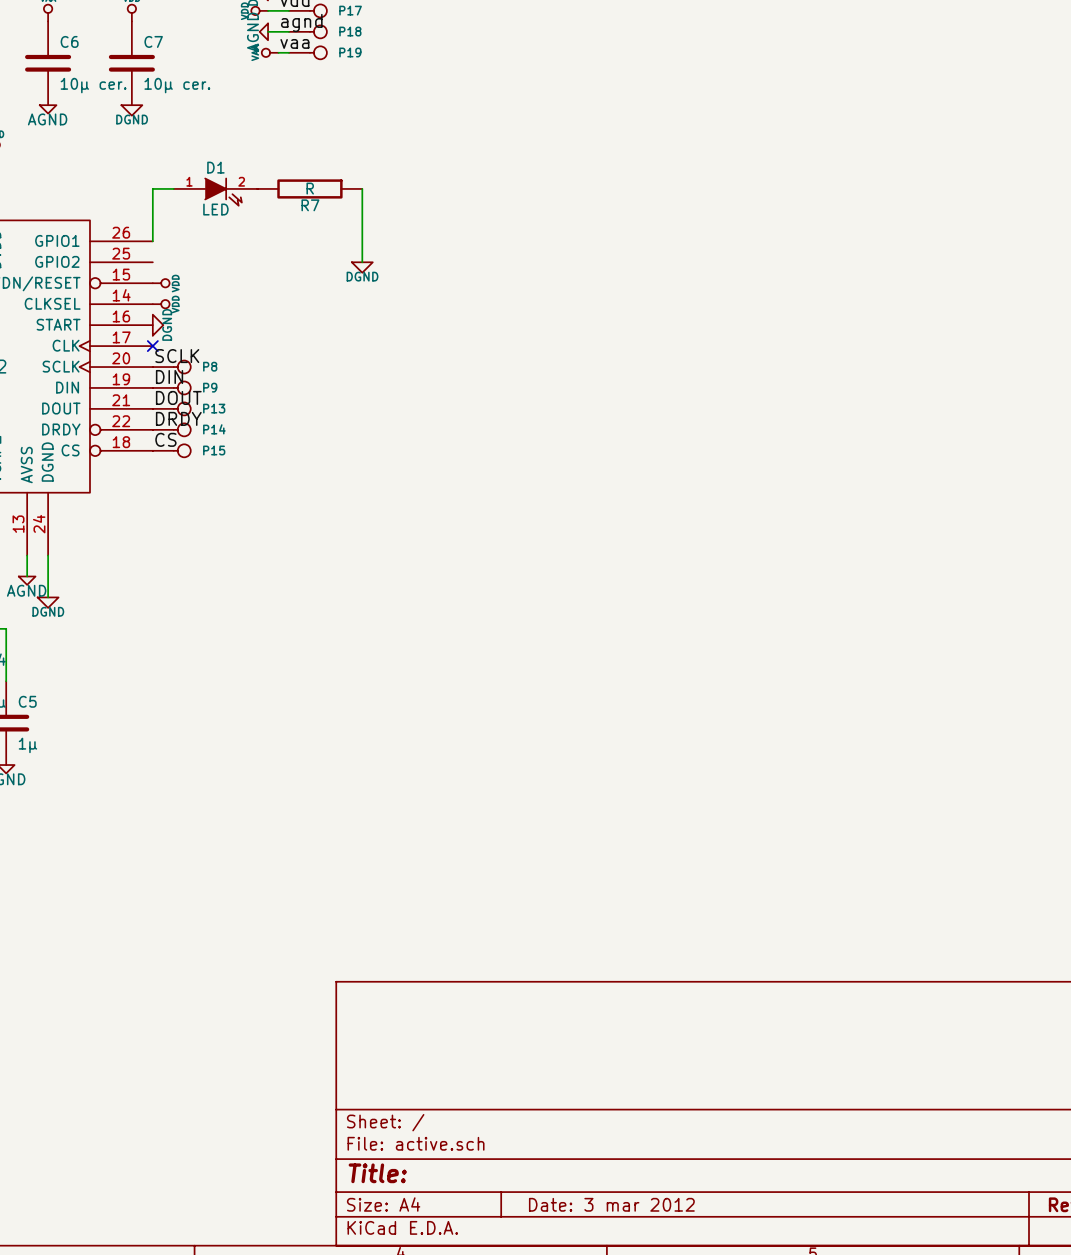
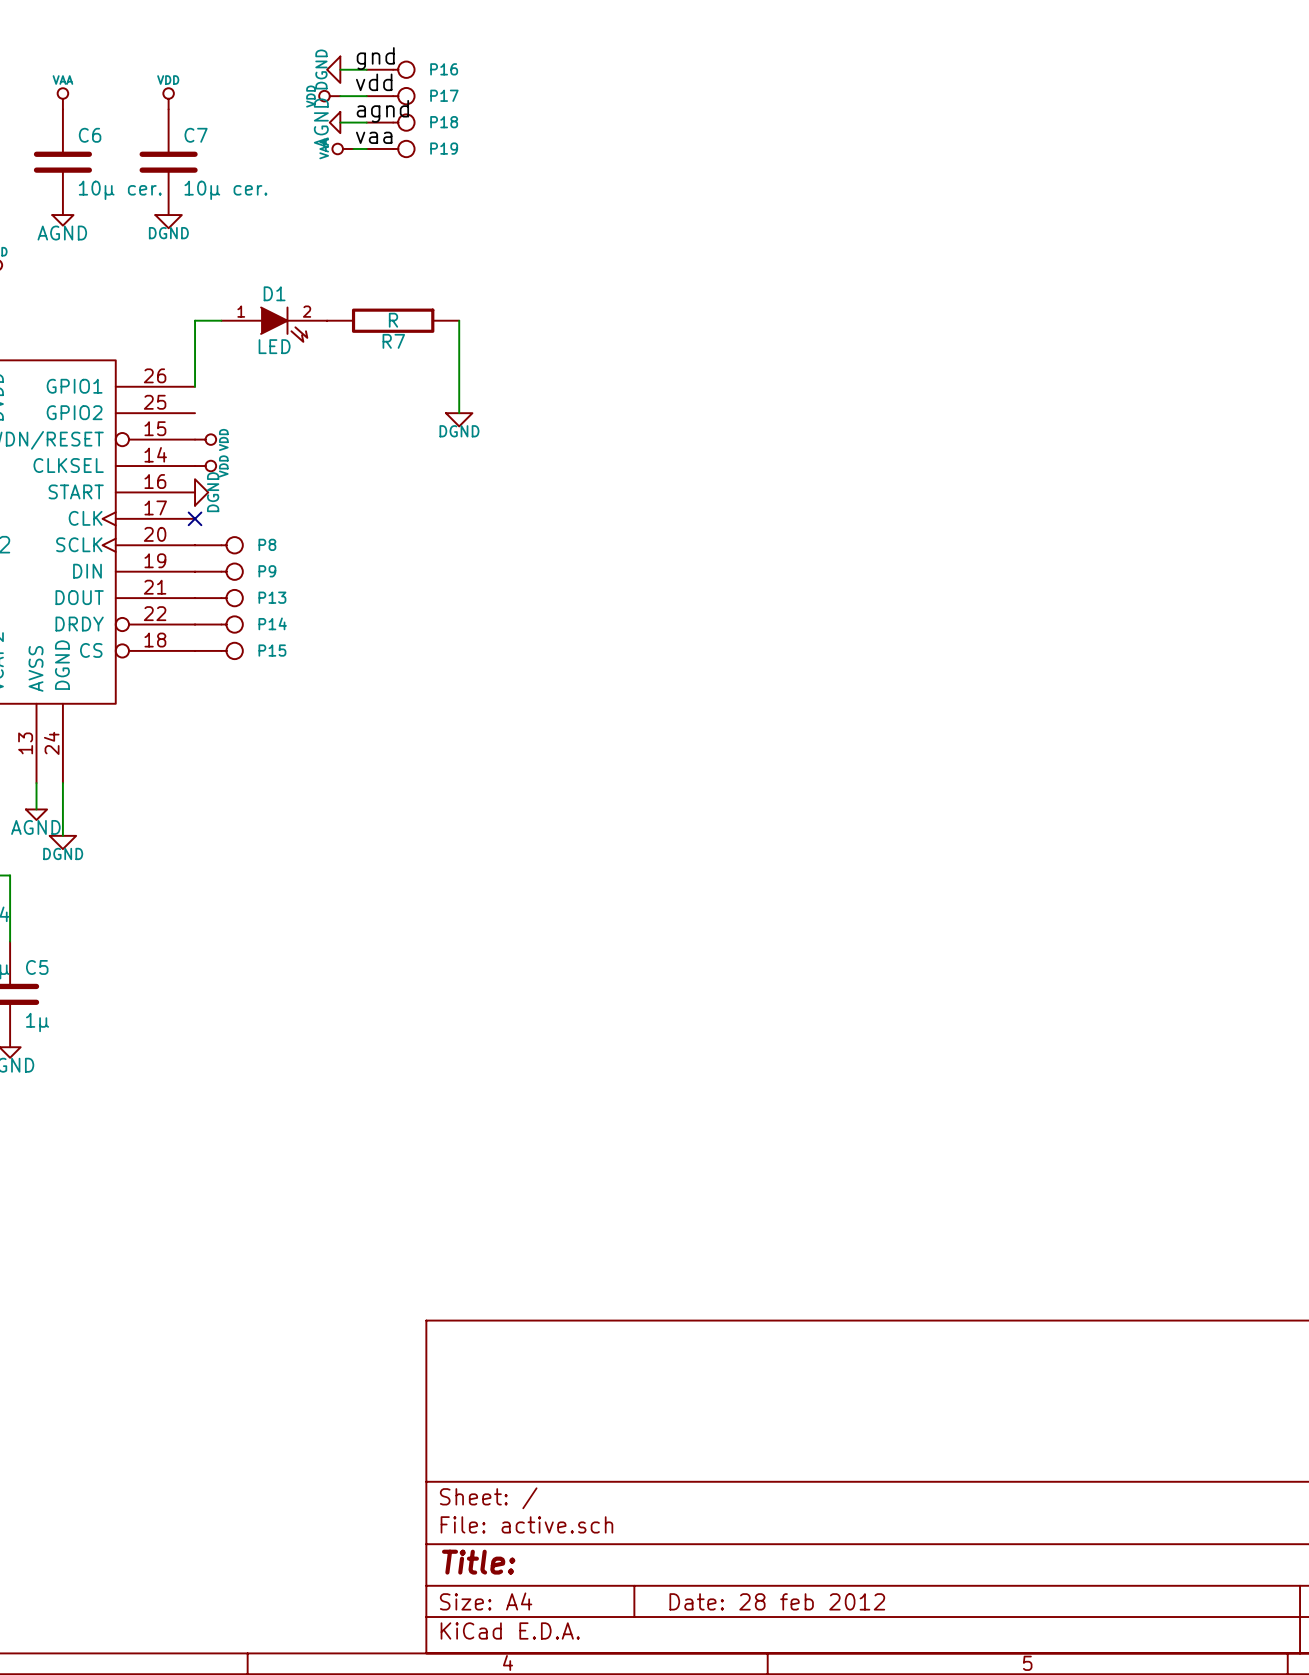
label: SCLK (177, 356) -> none
label: DIN (169, 377) -> none
label: DOUT (178, 397) -> none
label: DRDY (178, 418) -> none
label: CS (165, 439) -> none
title block: Date: 3 mar 2012 (611, 1204) -> Date: 28 feb 2012 (777, 1601)

